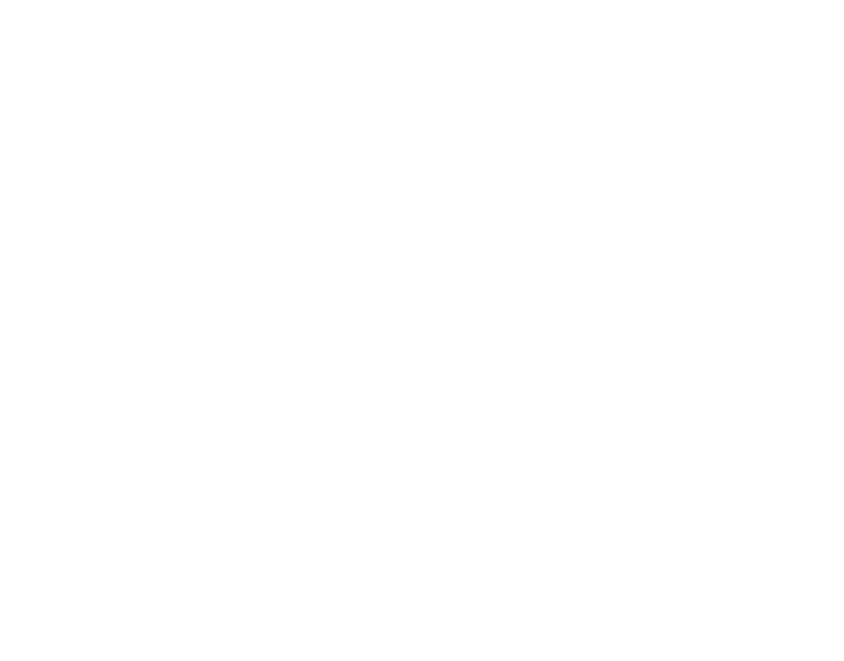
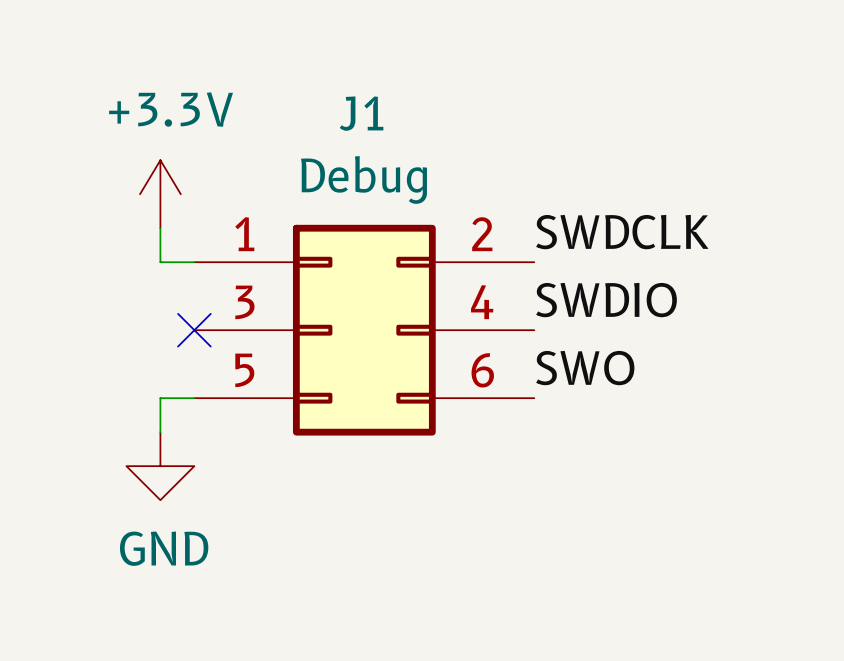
power symbol: none -> +3.3V (160, 194)
wire: none -> (160, 228) (160, 262) (194, 262)
label: none -> SWDCLK (622, 232)
label: none -> SWDIO (606, 300)
no-connect mark: none -> (194, 330)
J1: none -> Debug (364, 330)
label: none -> SWO (585, 368)
wire: none -> (194, 398) (160, 398) (160, 432)
power symbol: none -> GND (160, 466)

